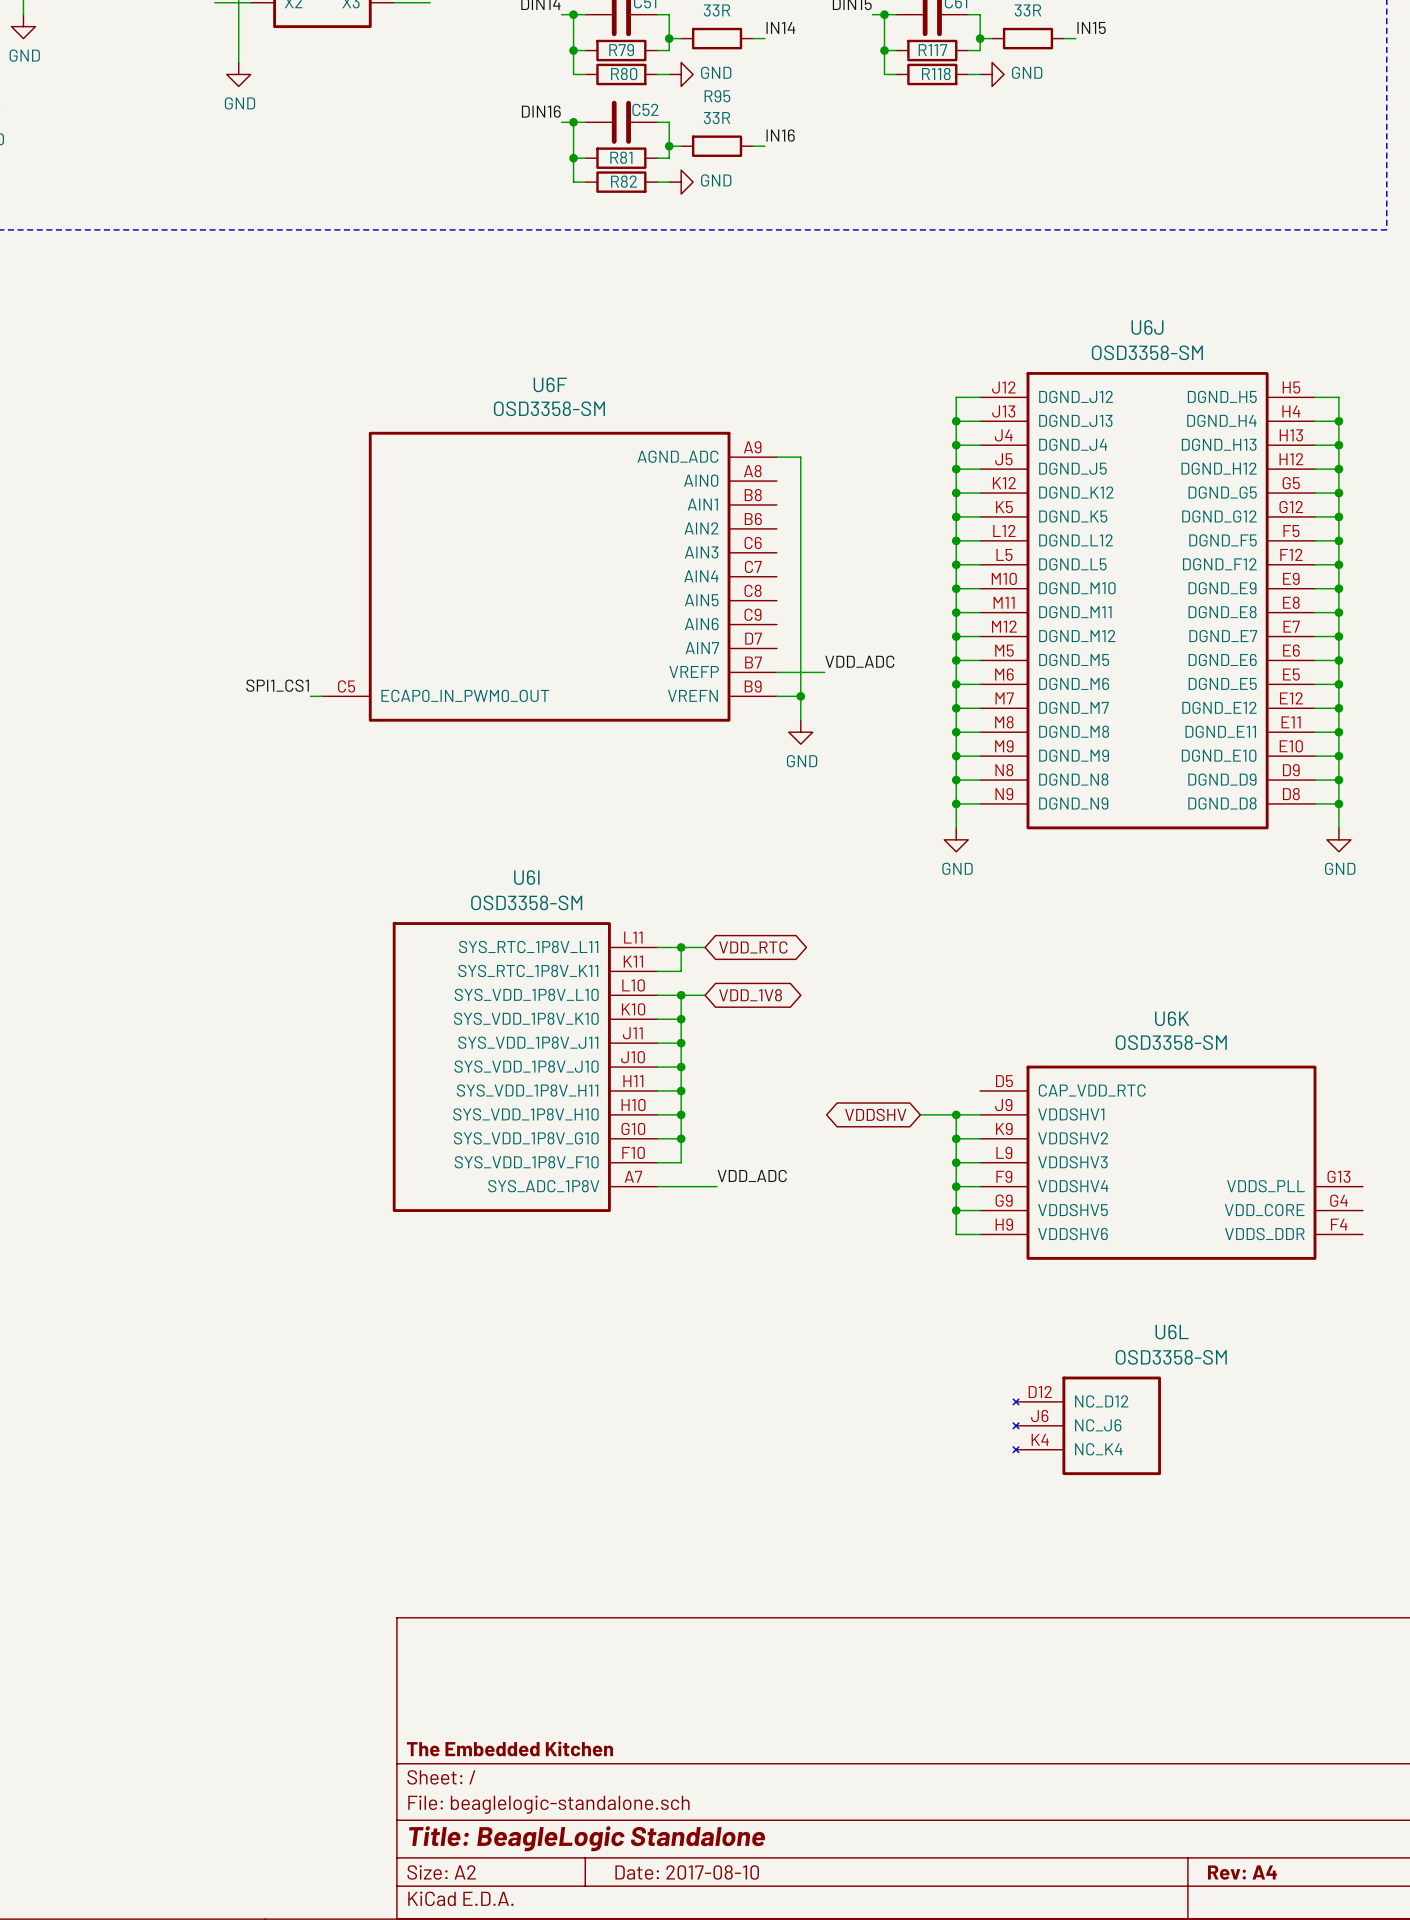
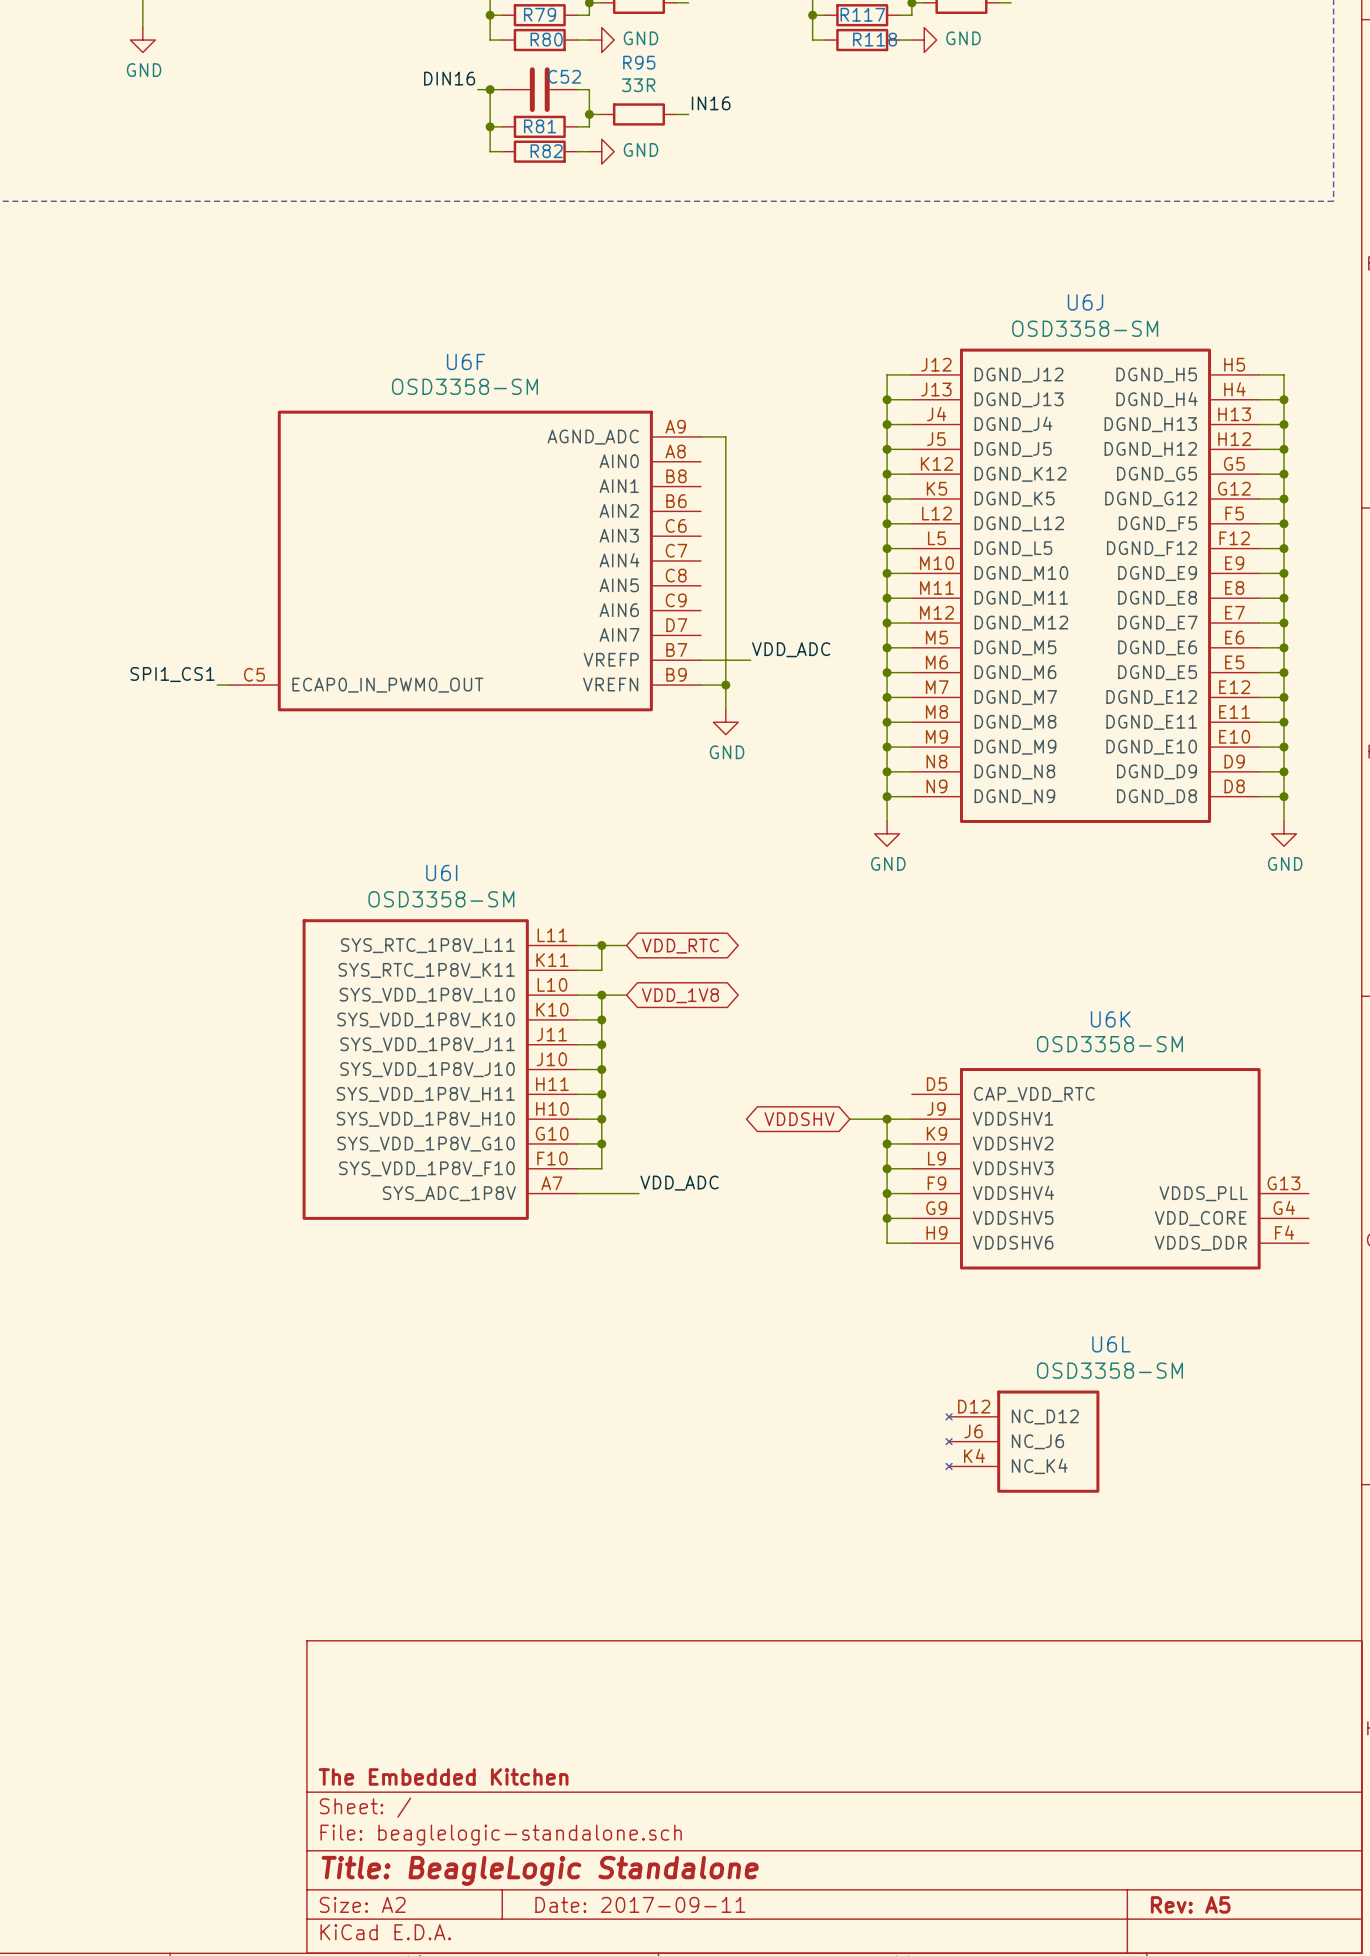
title block: Date: 2017-08-10 (687, 1872) -> Date: 2017-09-11 (640, 1904)
title block: Rev: A4 (1242, 1872) -> Rev: A5 (1190, 1904)

